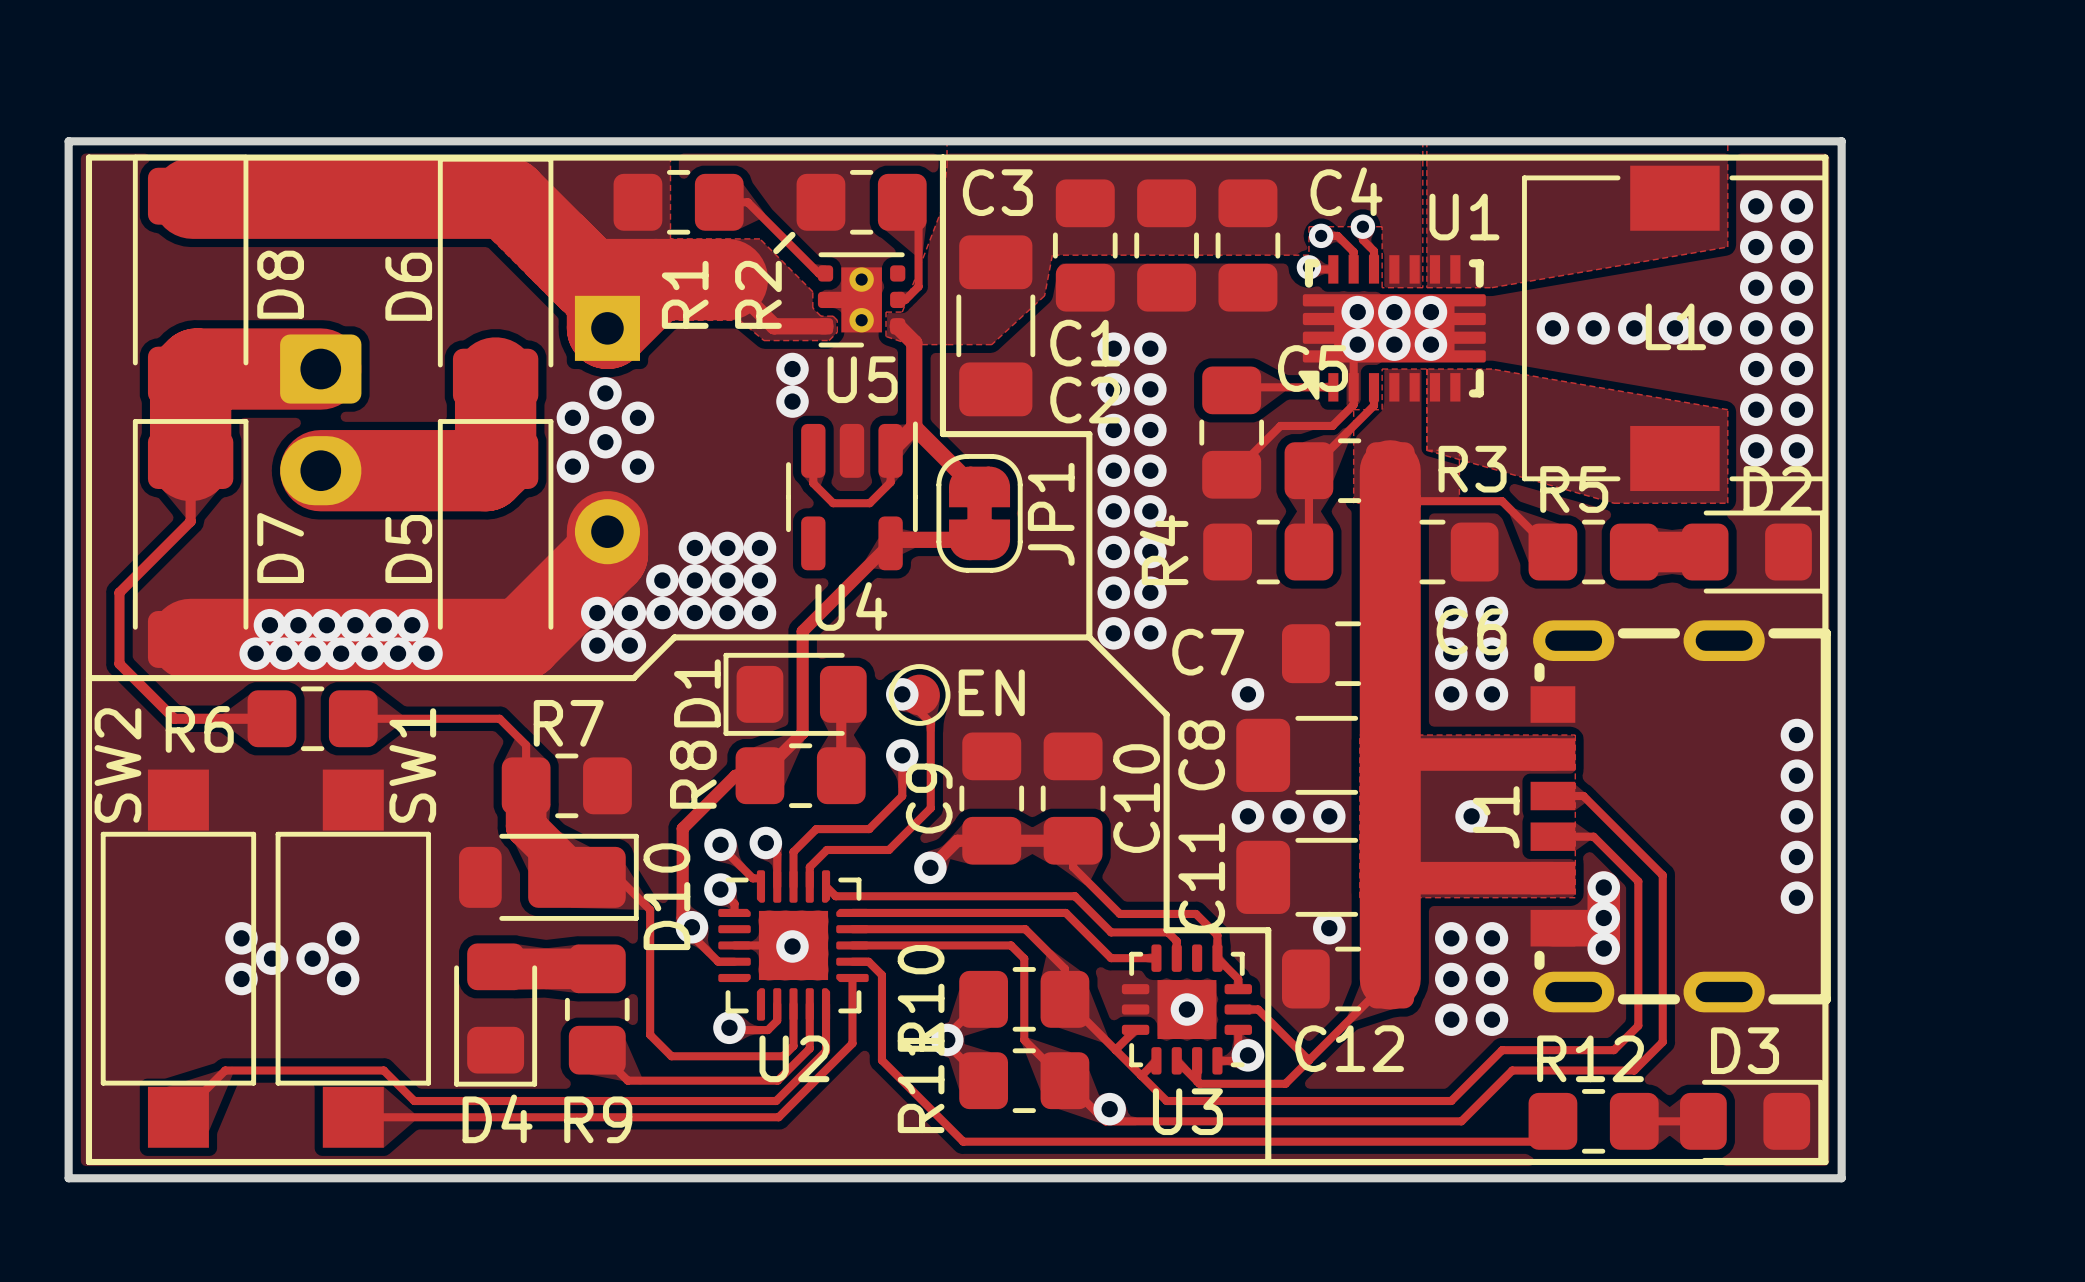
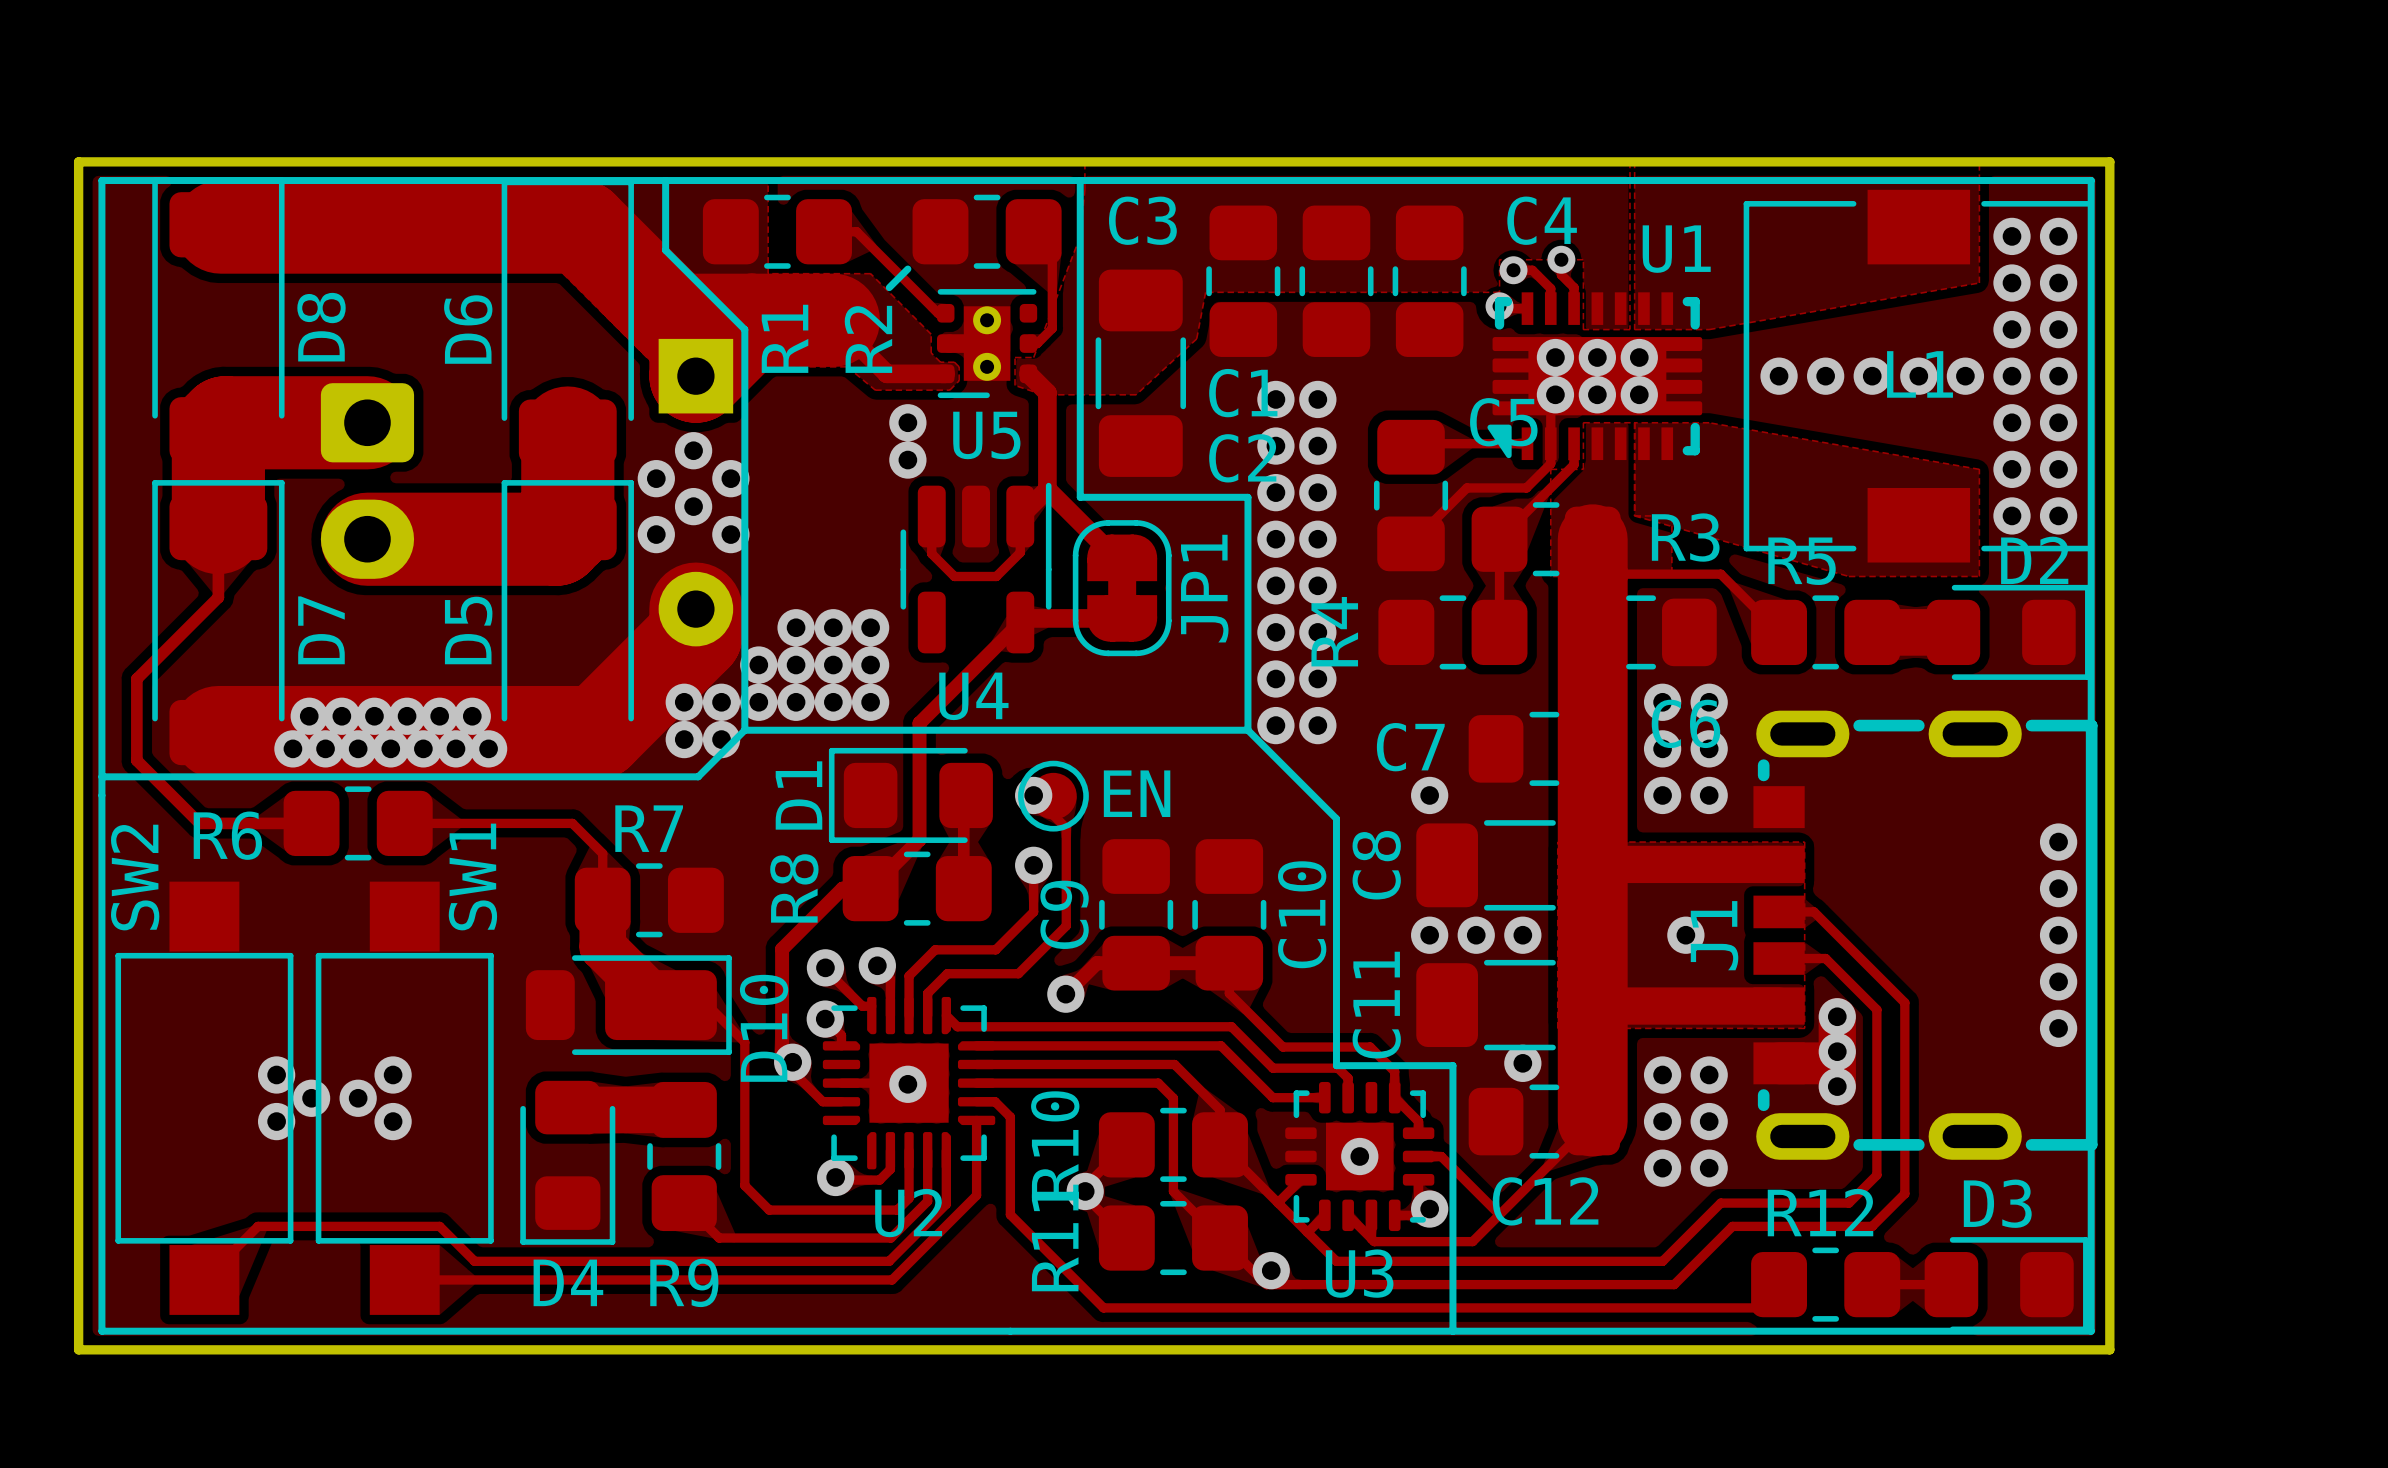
line: none -> (665, 180) (665, 250) (744, 329) (744, 730)
line: none -> (744, 730) (772, 730)
line: (674, 637) (633, 678) (609, 678) -> (744, 730) (698, 776)
C7 name position: C7 (1208, 652) -> C7 (1410, 747)

